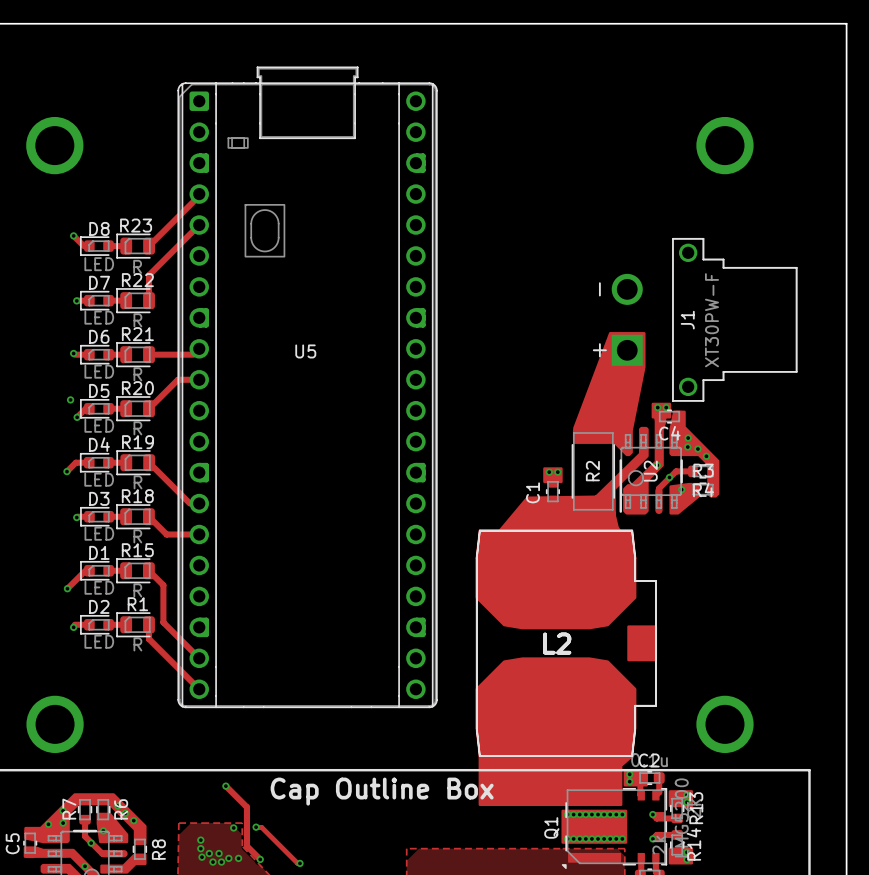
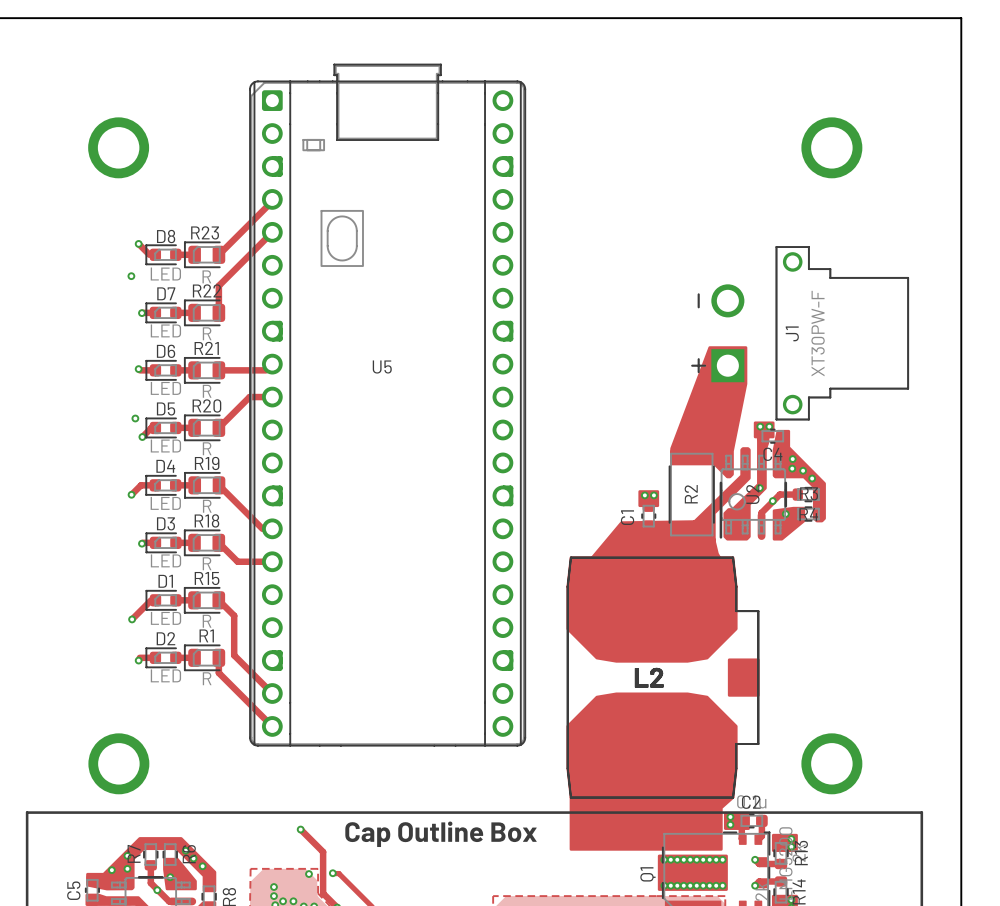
via: none -> (131, 276)

